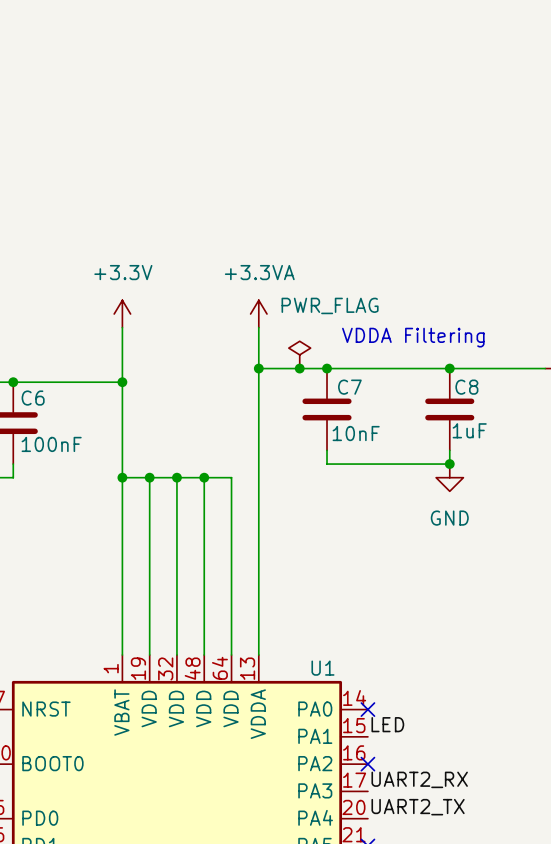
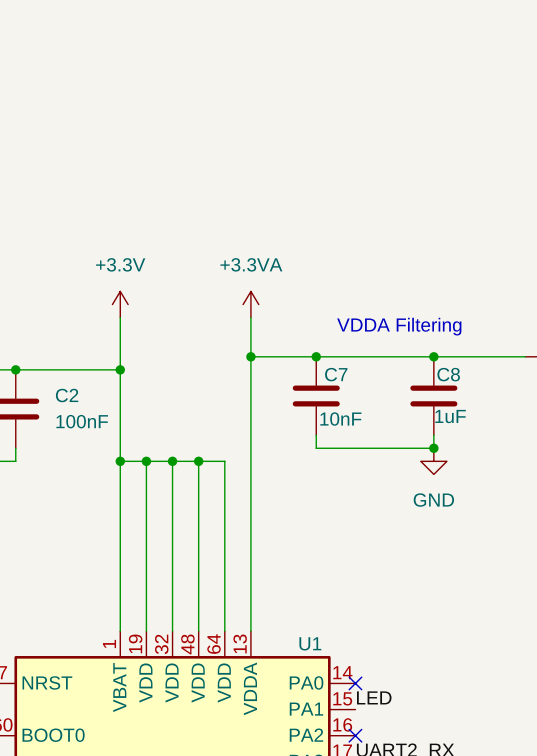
power symbol: PWR_FLAG (299, 354) -> none
junction: (299, 368) -> none
C6 name: C6 (33, 398) -> C2 (67, 395)
C6 value position: 100nF (51, 444) -> 100nF (82, 421)

